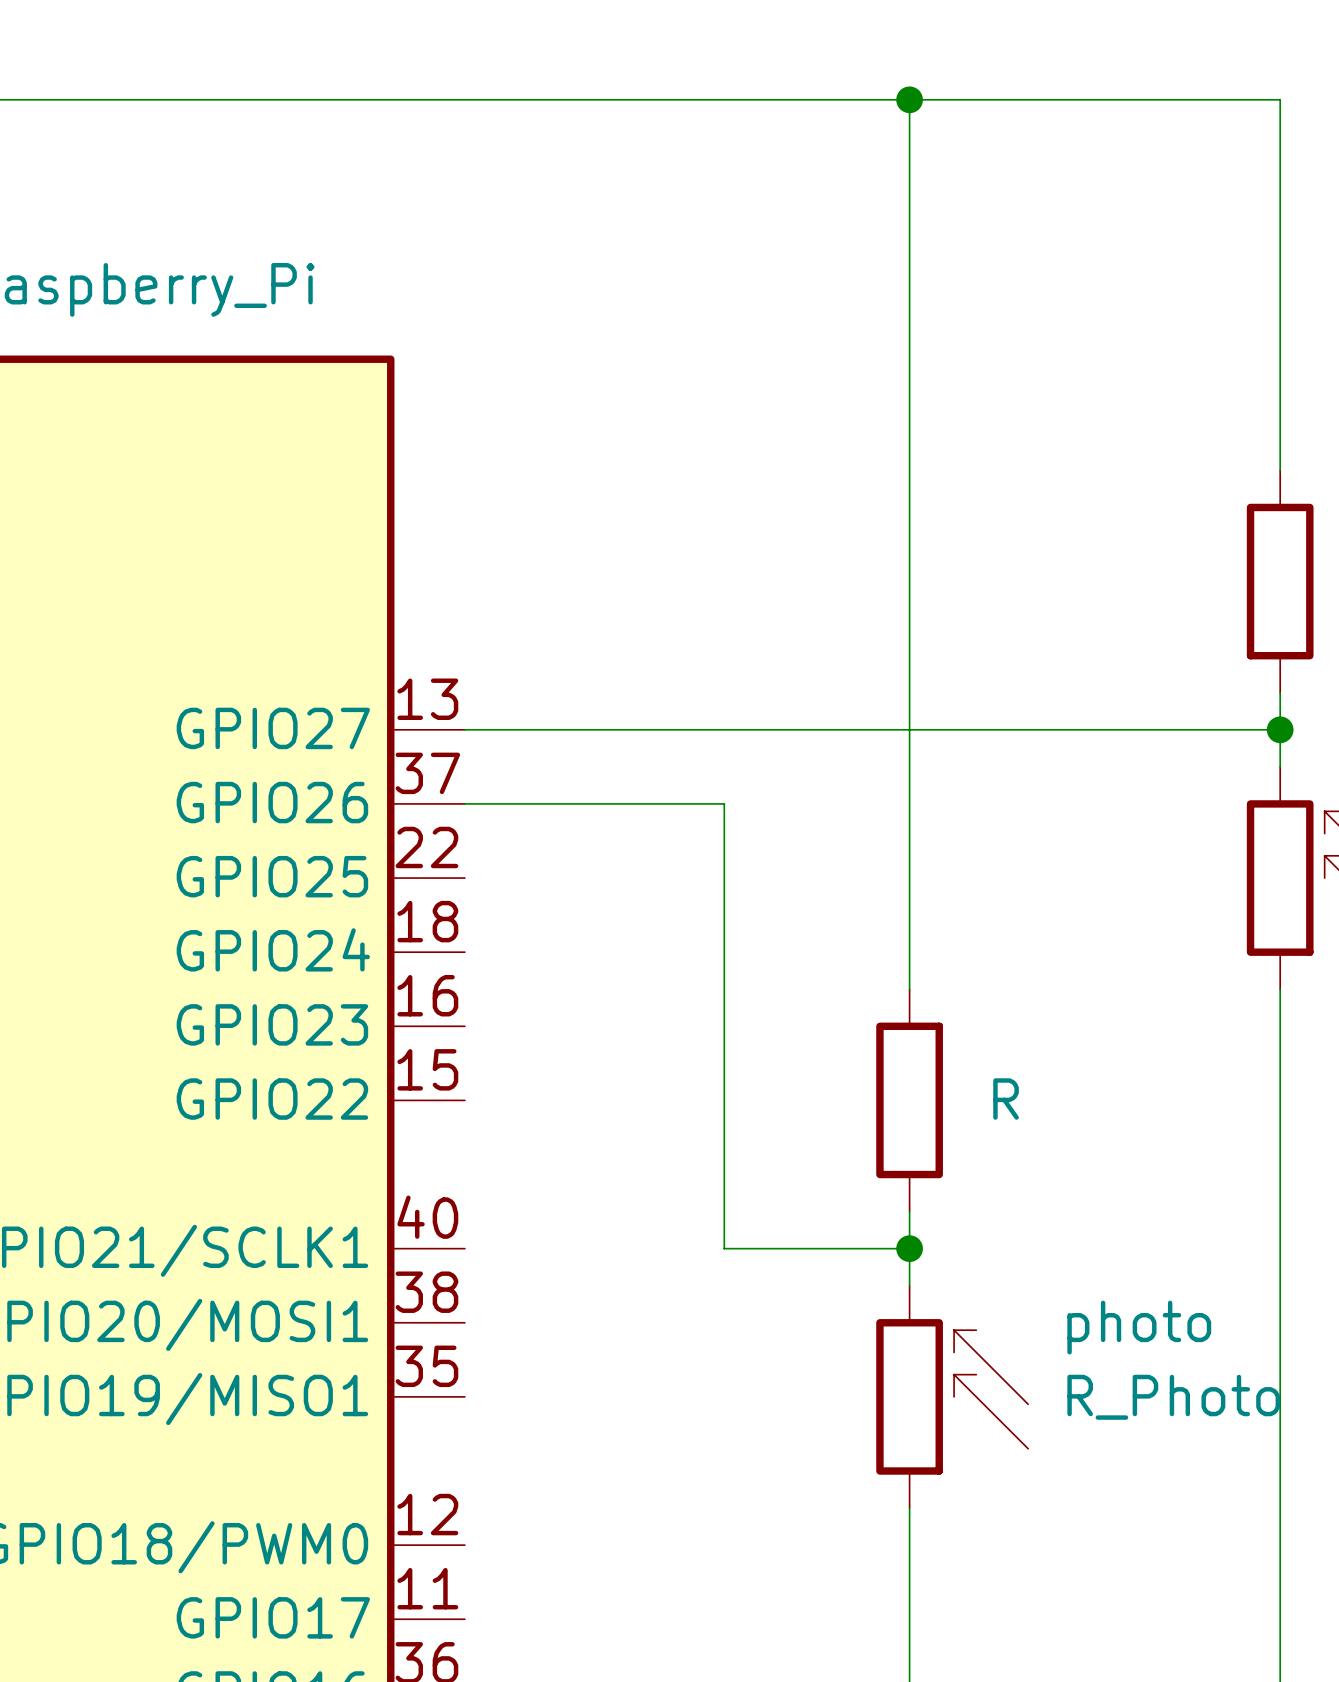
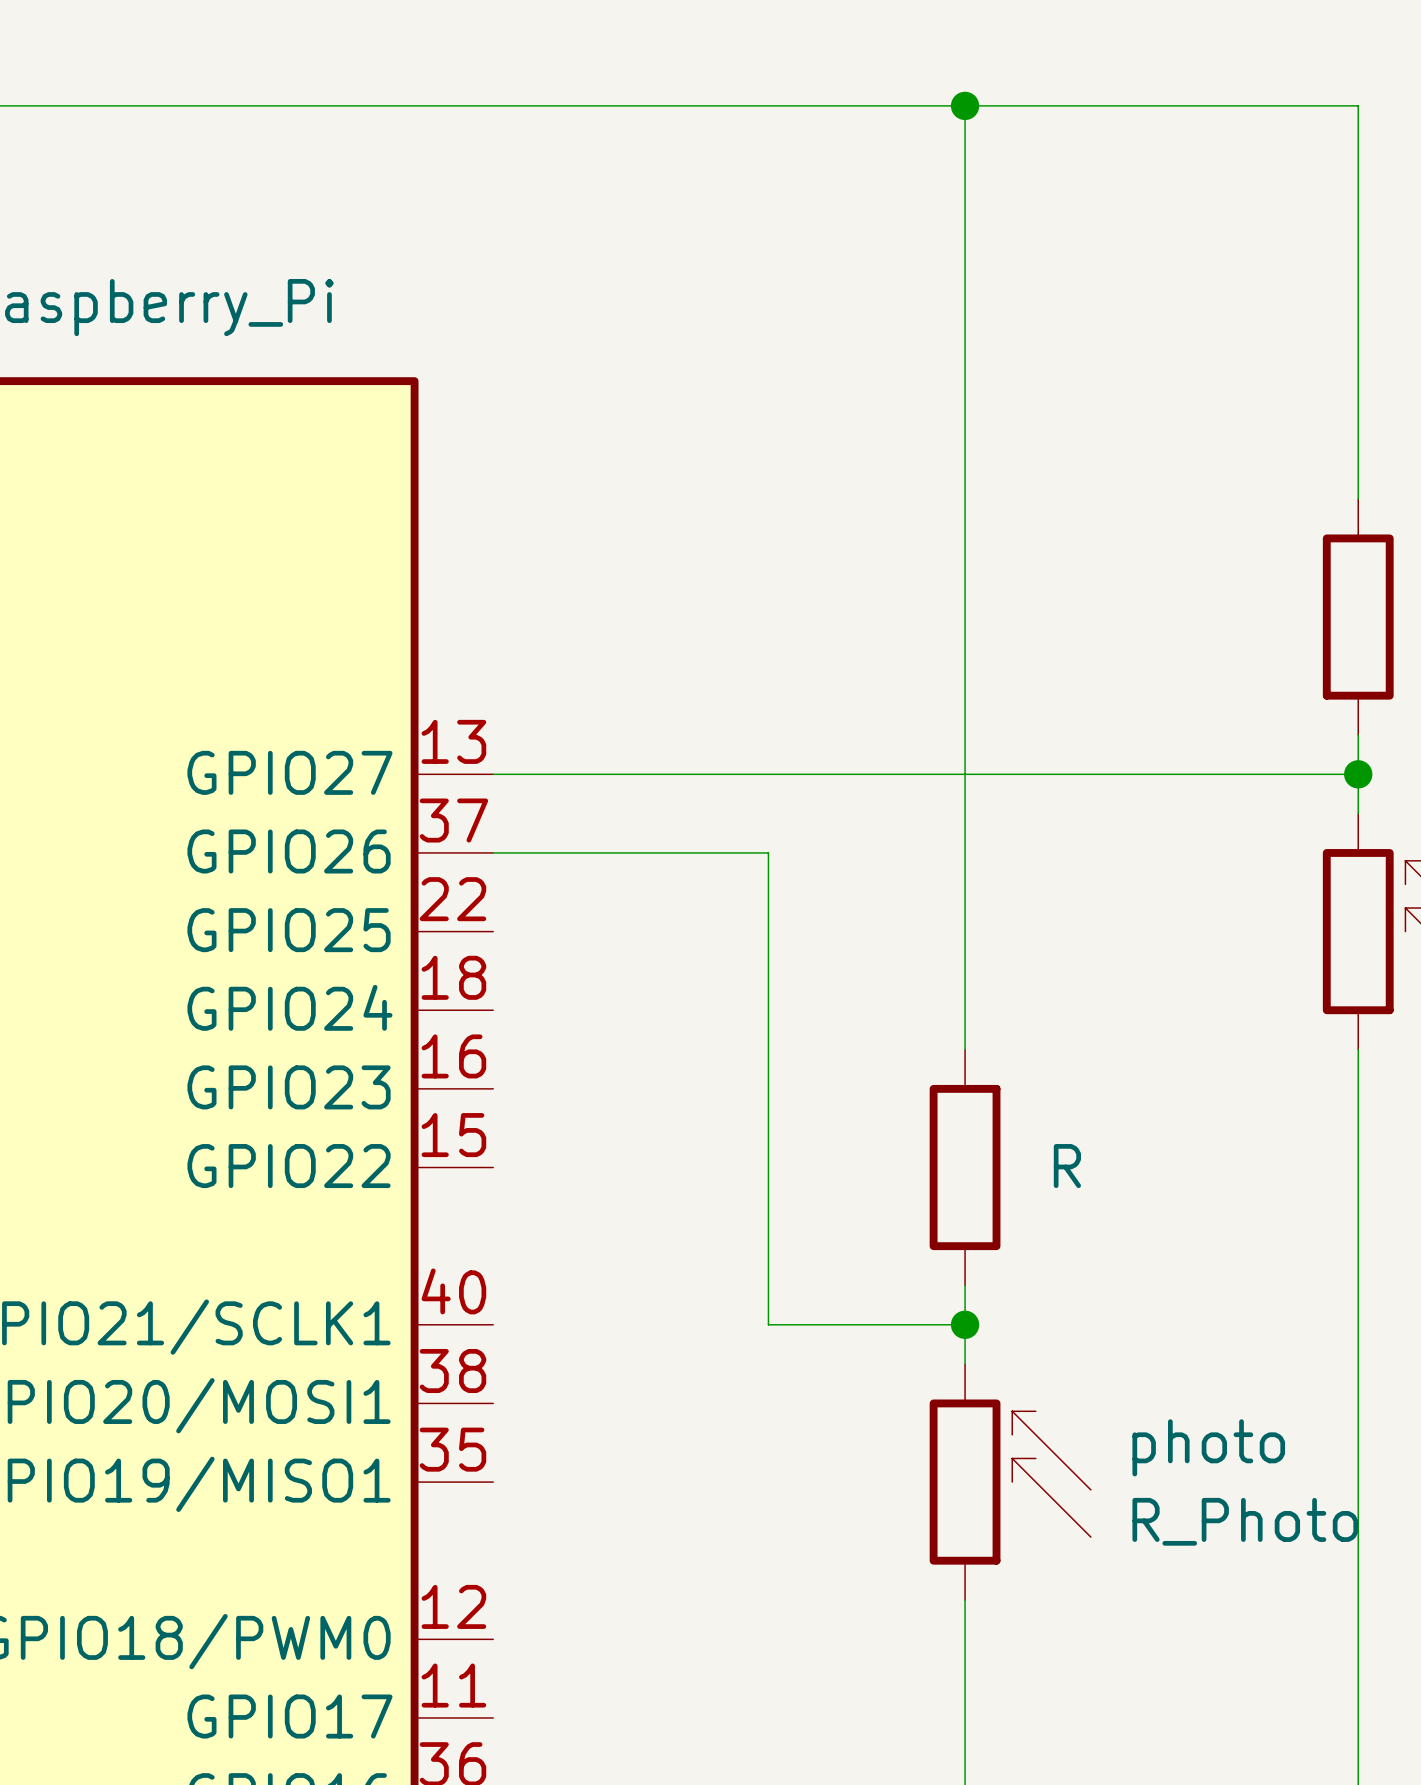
photo name position: photo (1139, 1327) -> photo (1208, 1447)
photo value position: R_Photo (1173, 1397) -> R_Photo (1245, 1521)

